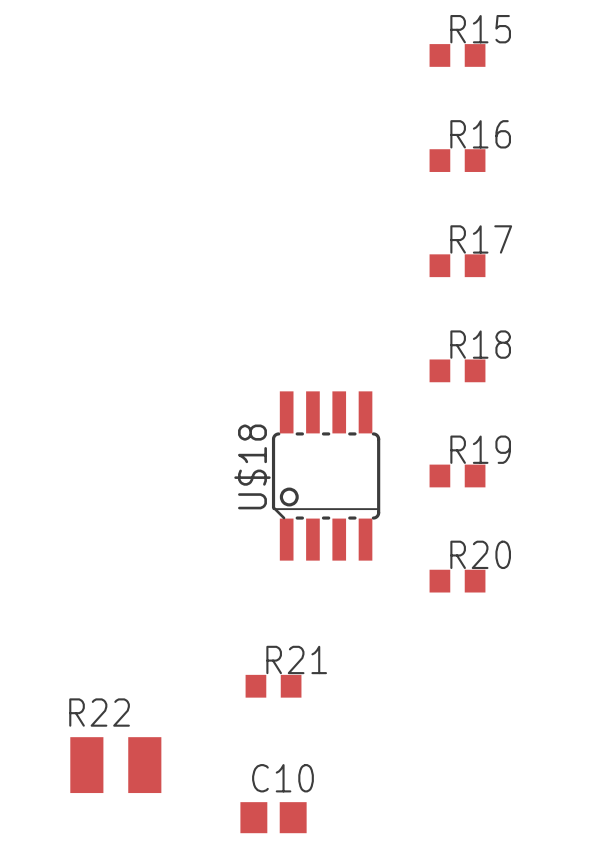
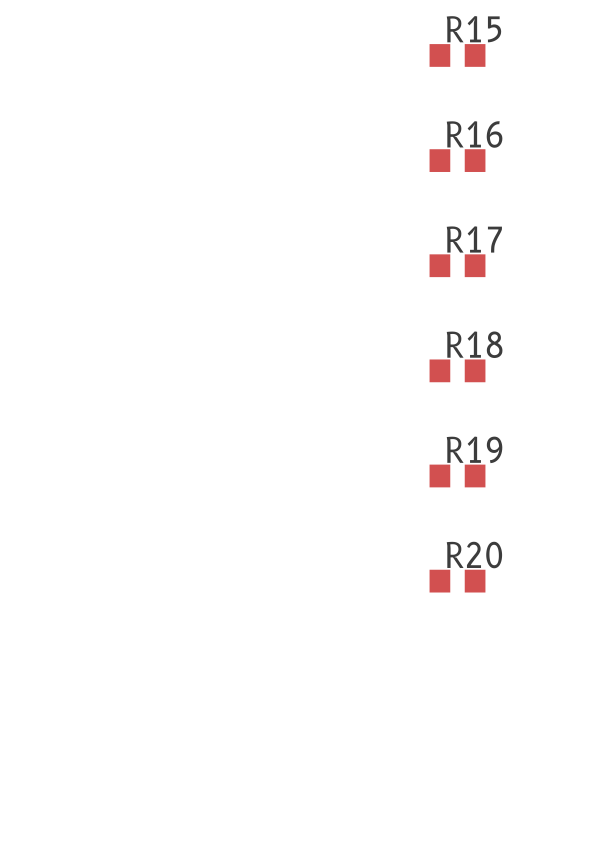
U$18: (326, 475) -> none
R21: (273, 686) -> none
R22: (115, 765) -> none
C10: (273, 817) -> none

